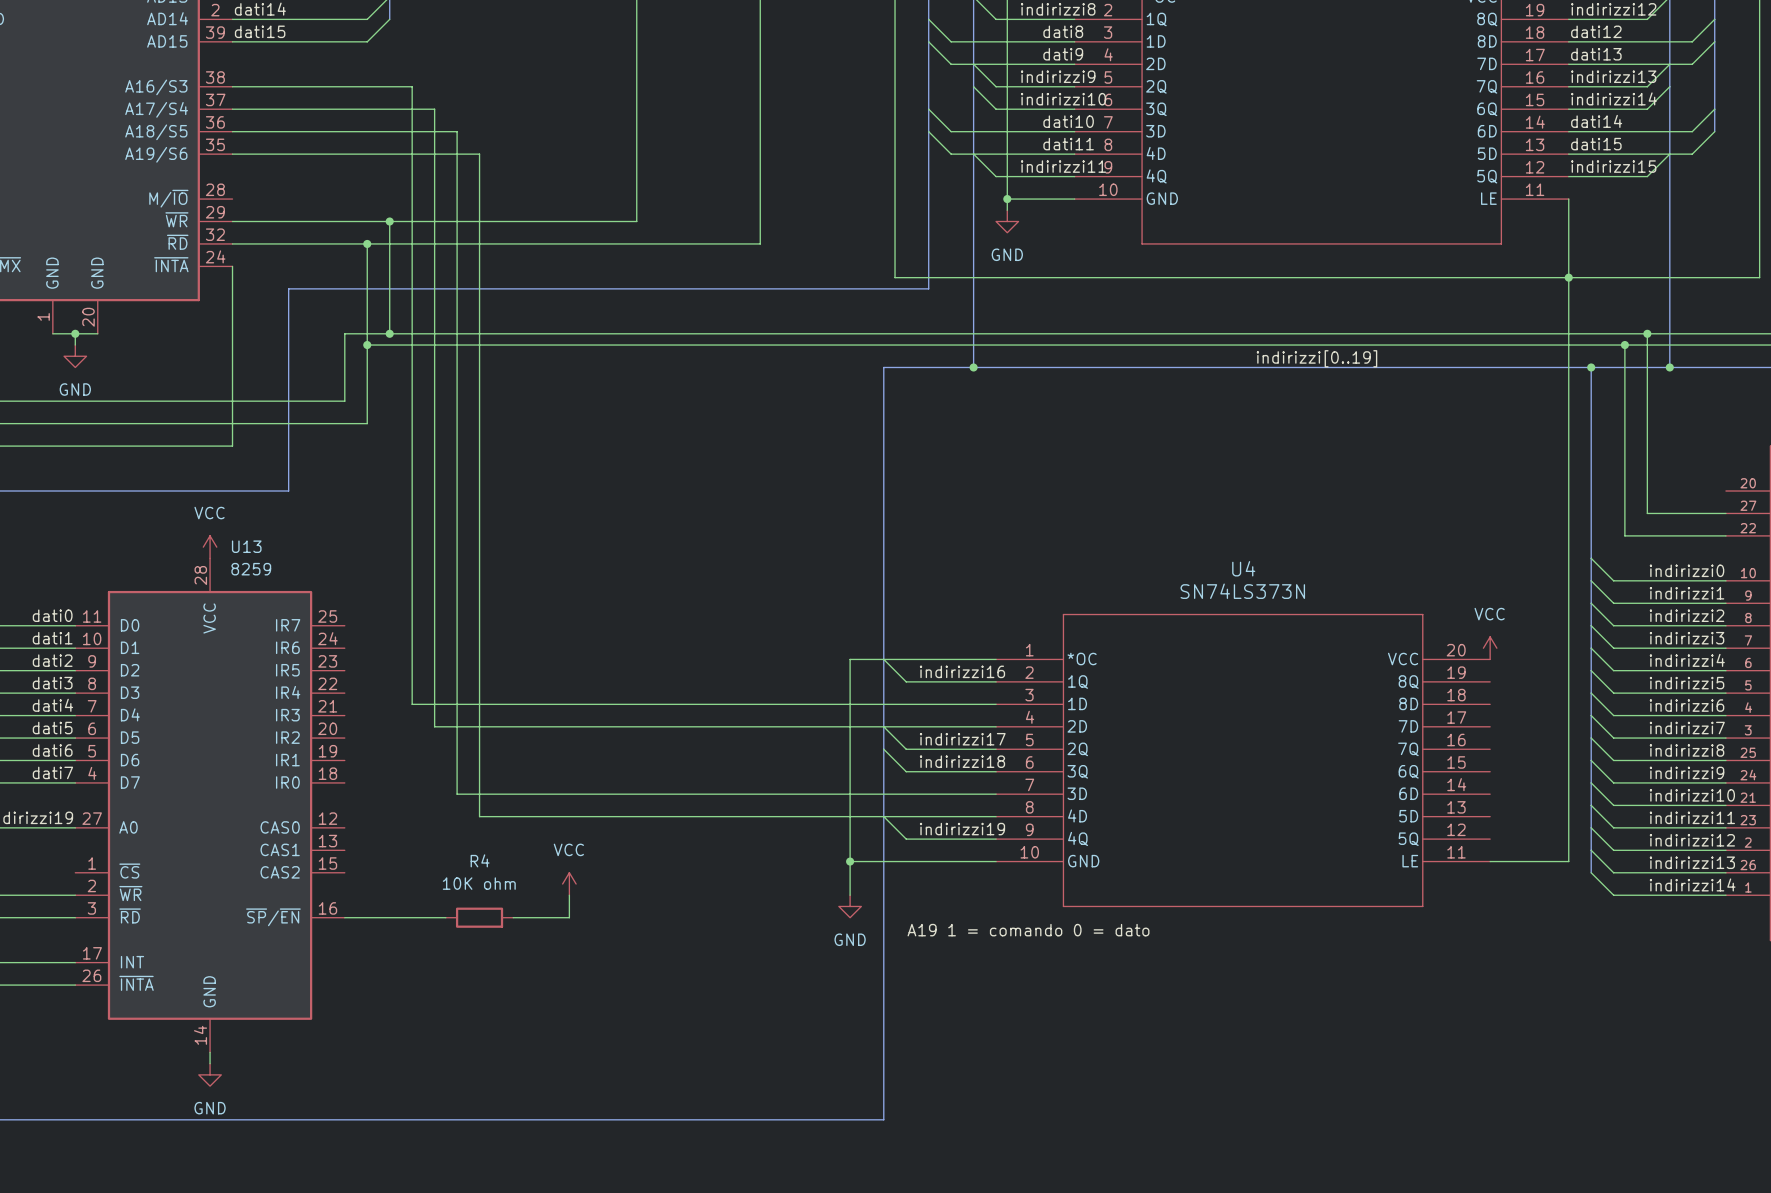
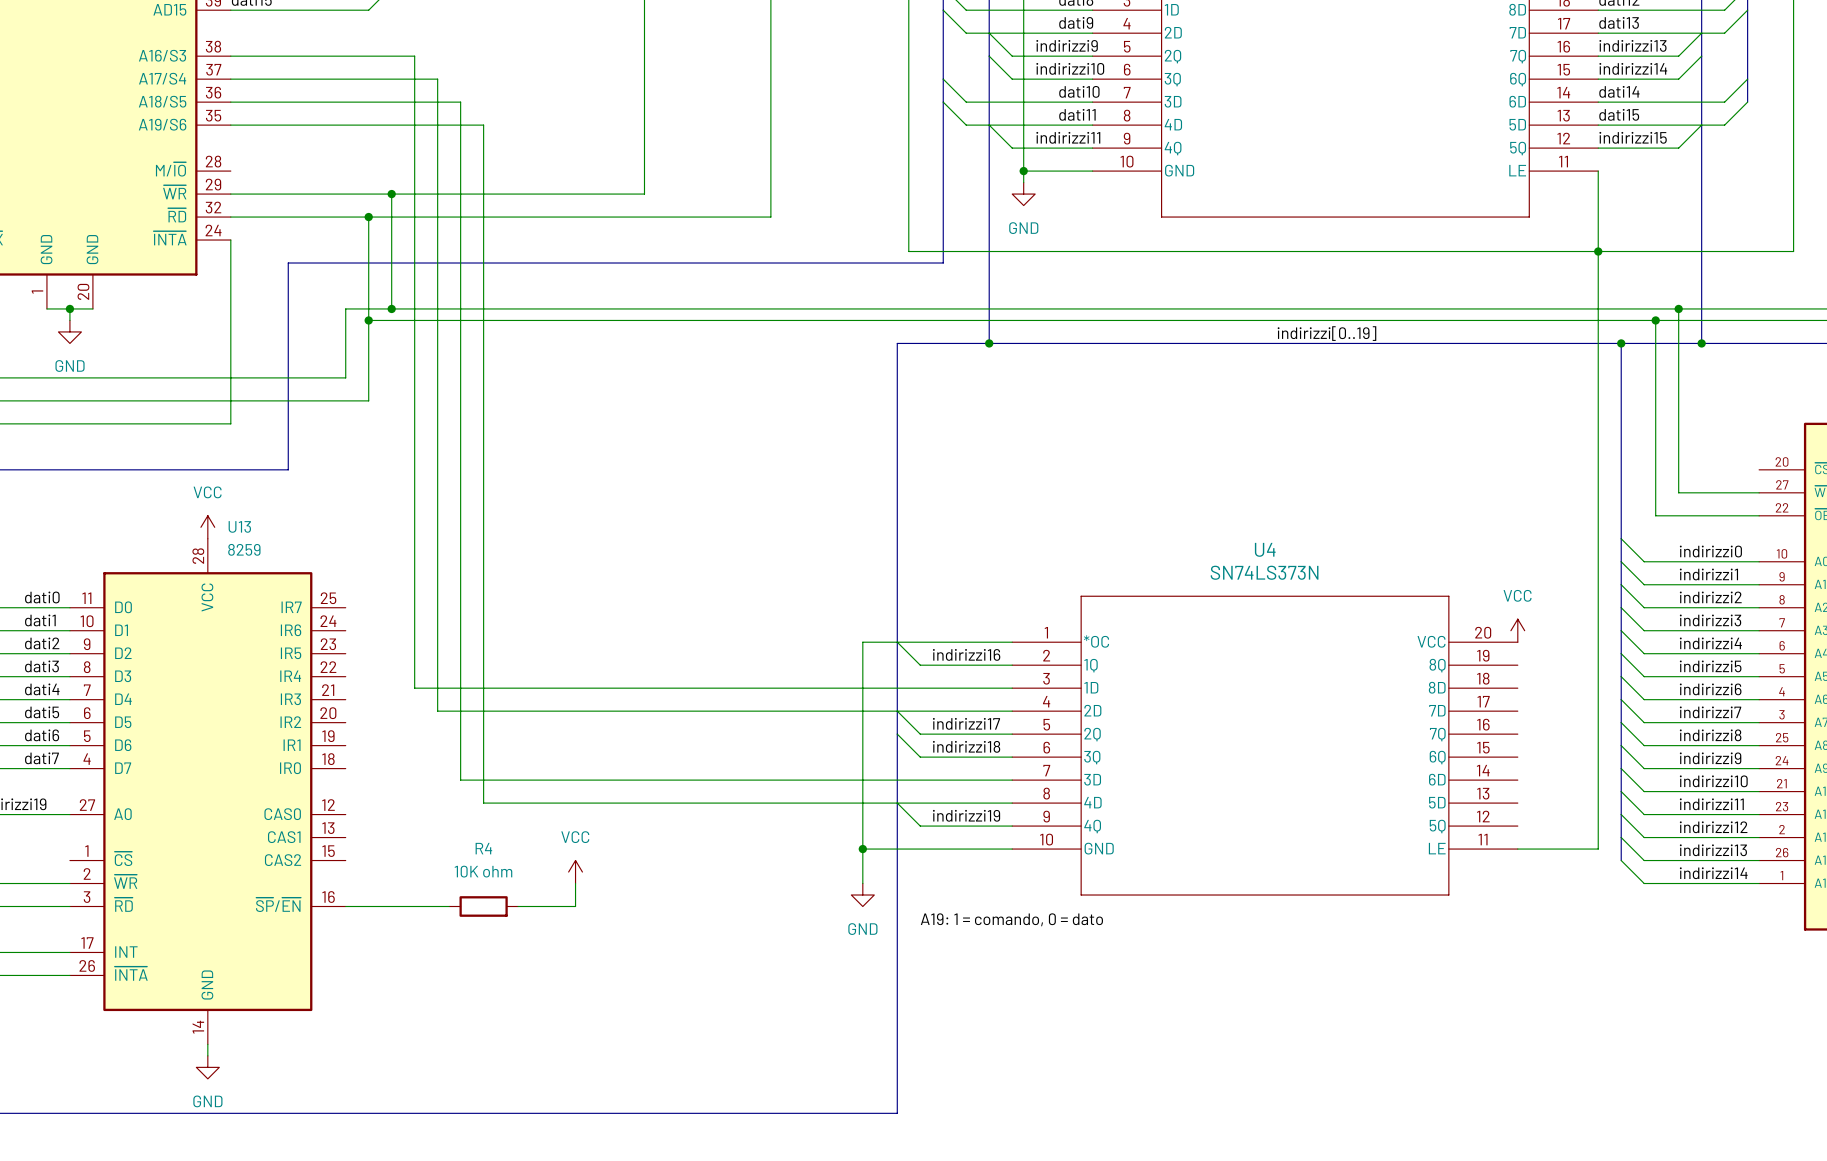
label: A19 1 = comando 0 = dato (1028, 930) -> A19: 1 = comando, 0 = dato (1011, 919)

